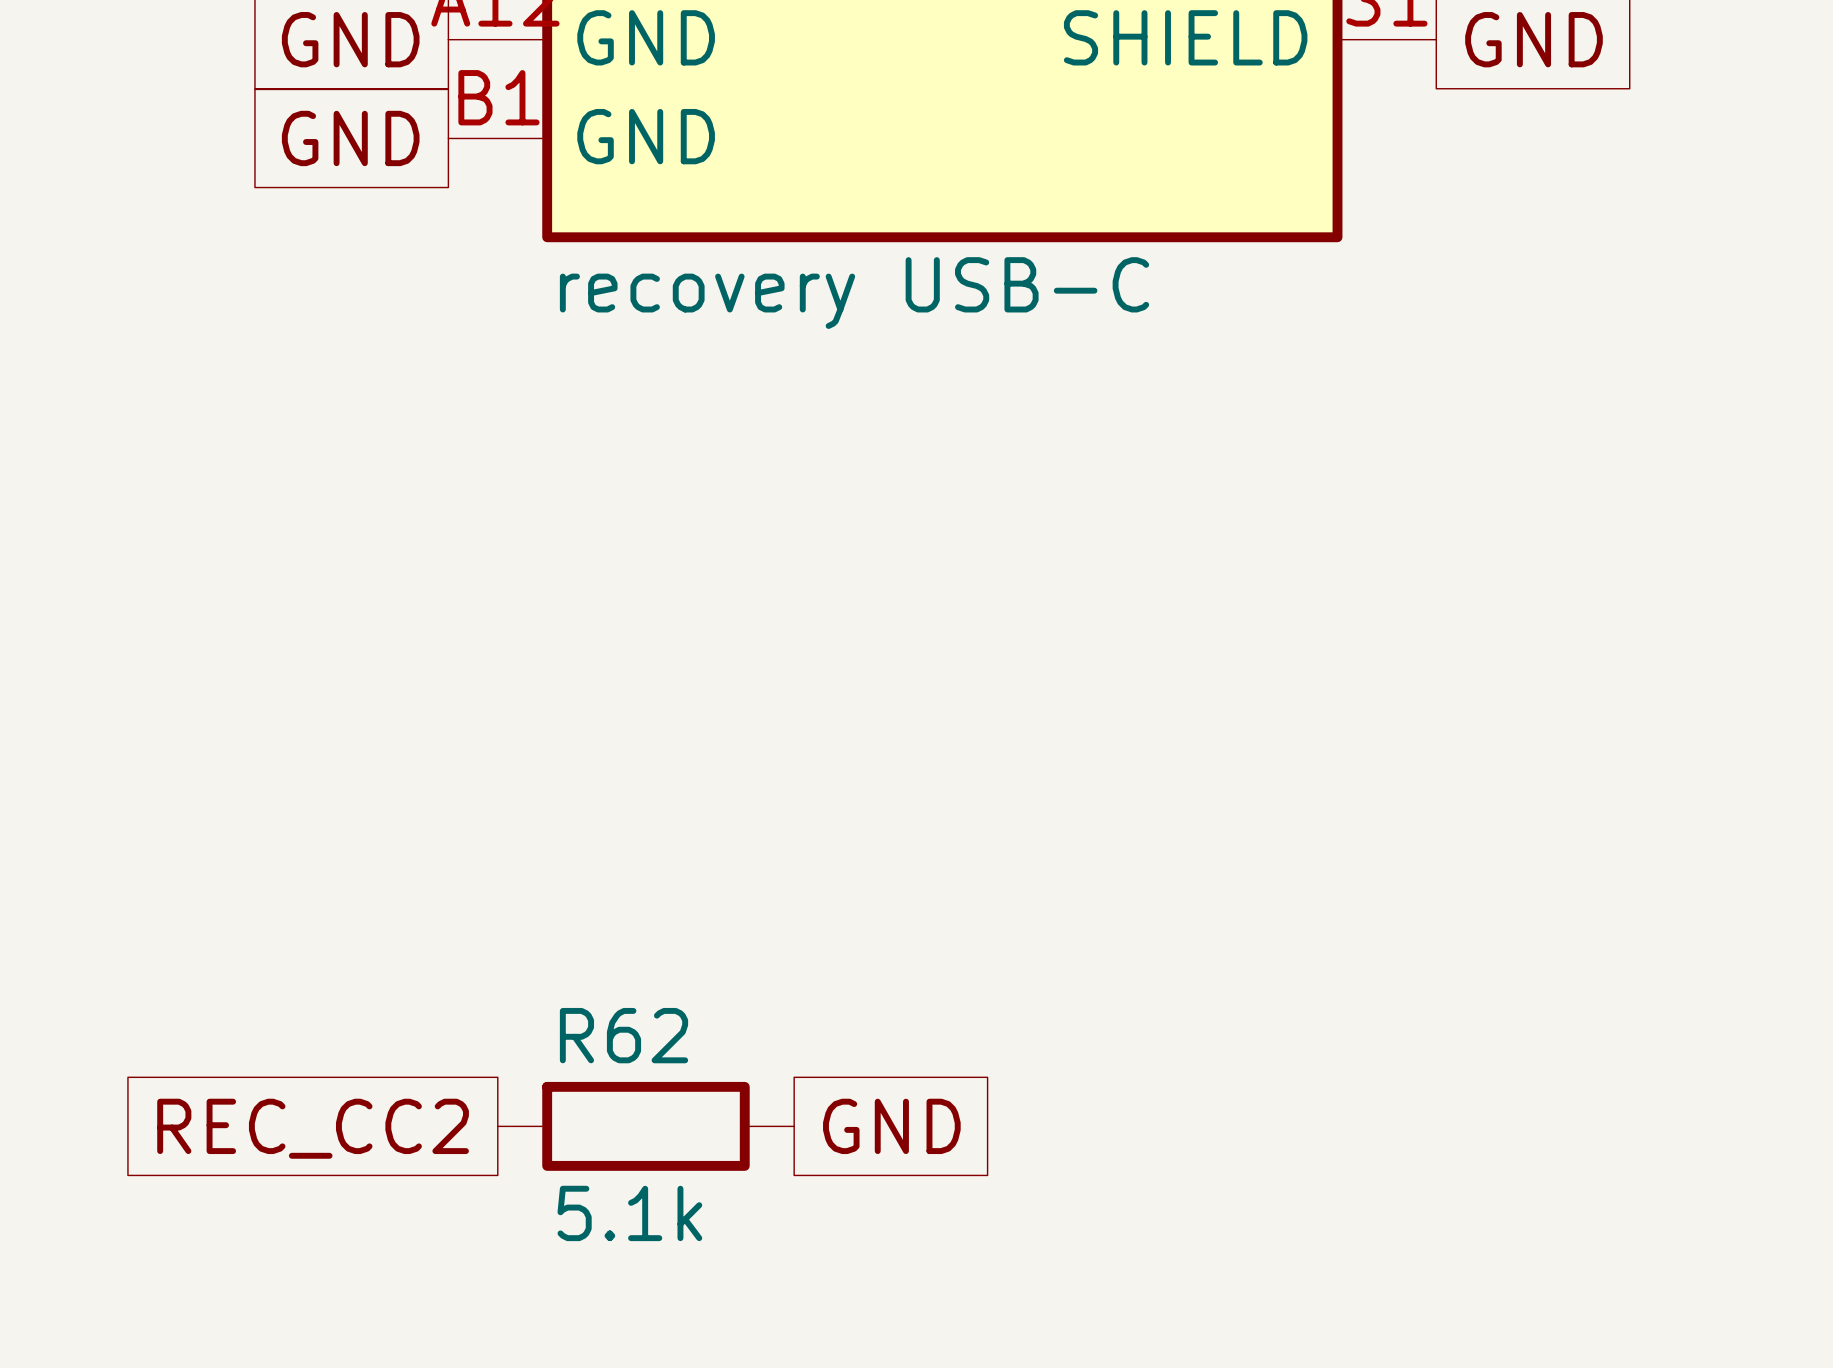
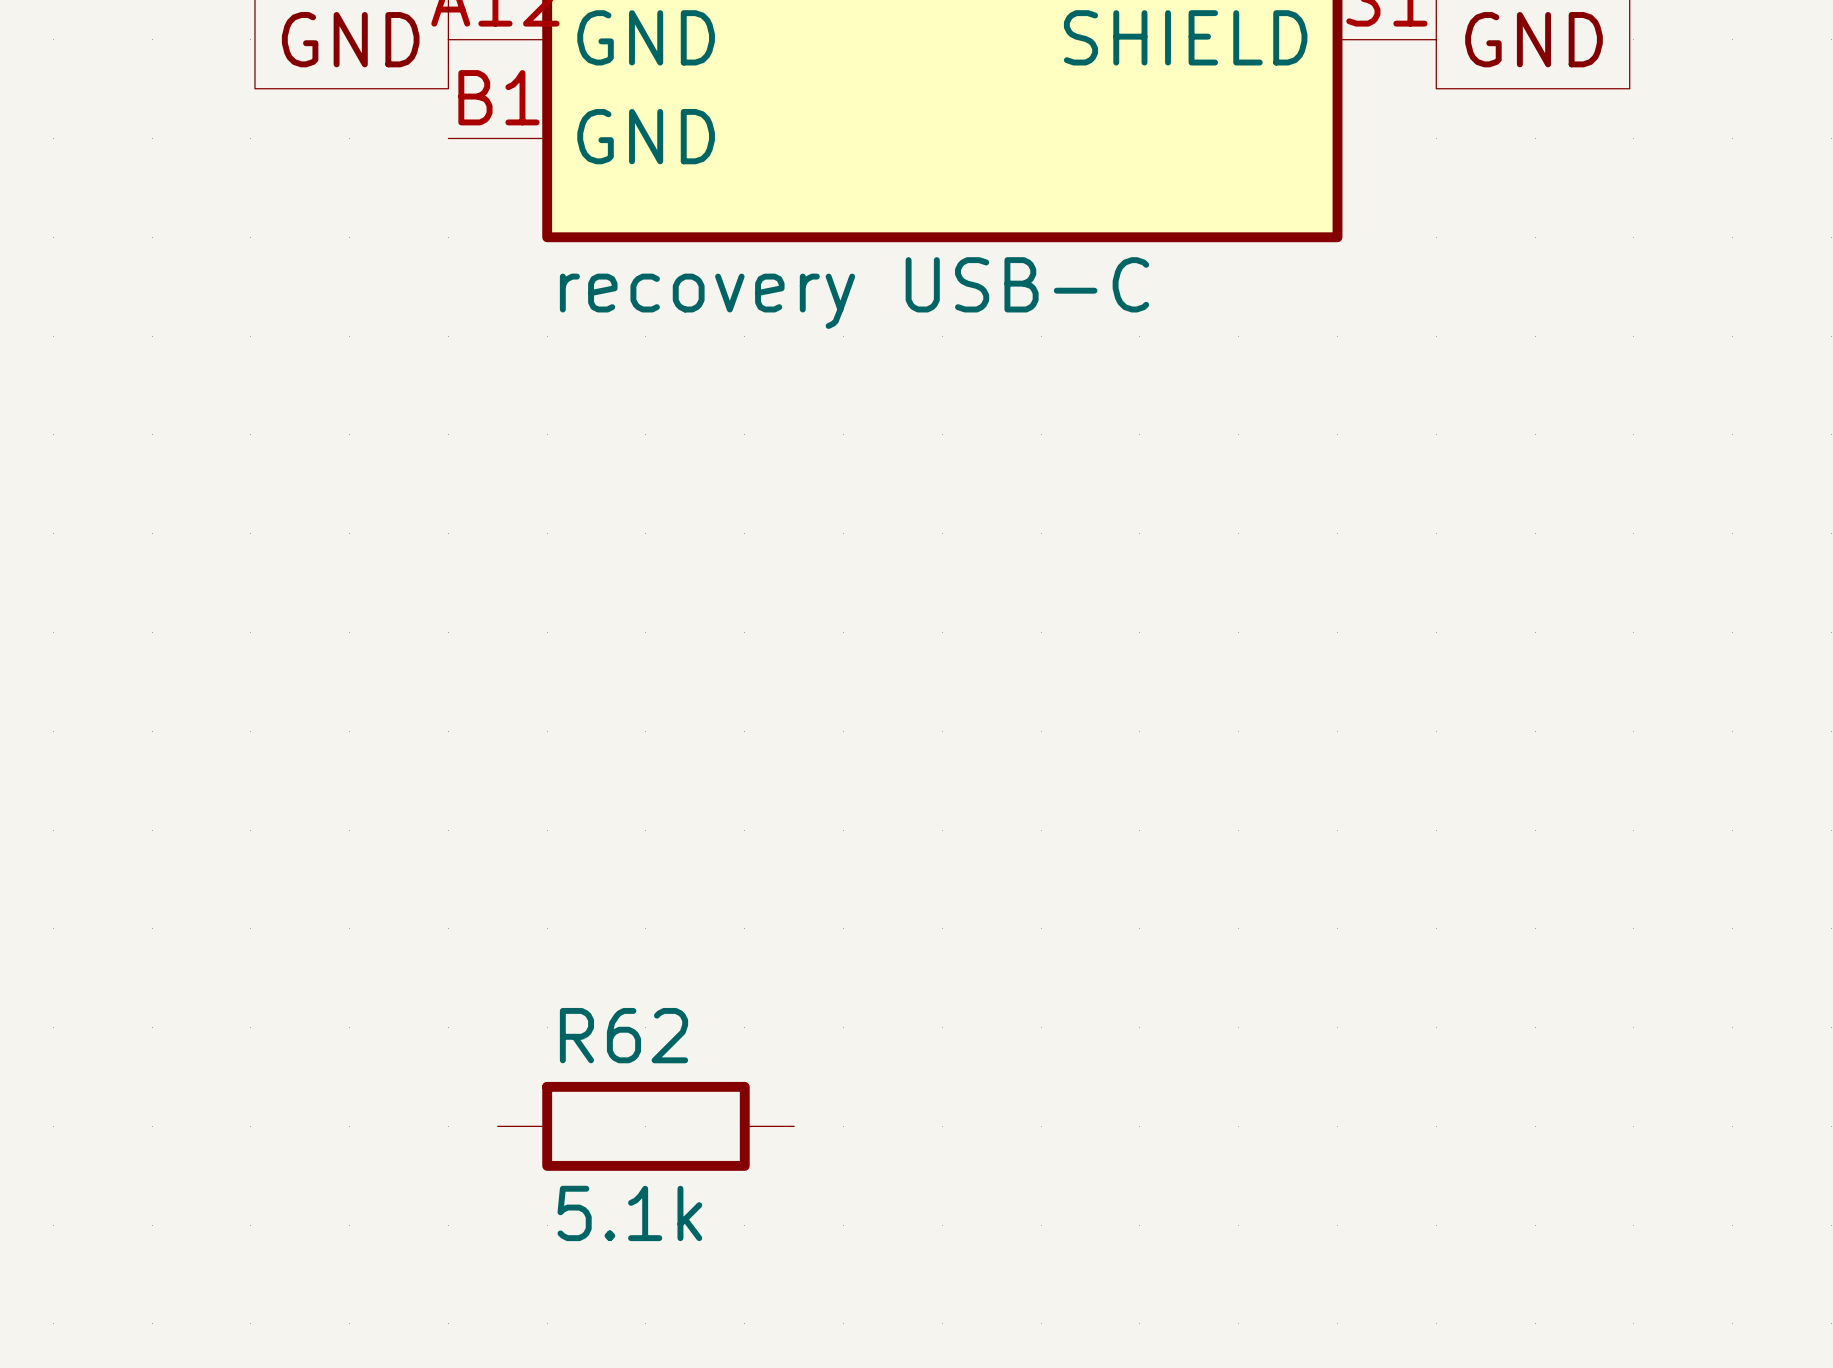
global label: GND (350, 138) -> none
global label: GND (891, 1126) -> none
global label: REC_CC2 (313, 1128) -> none

